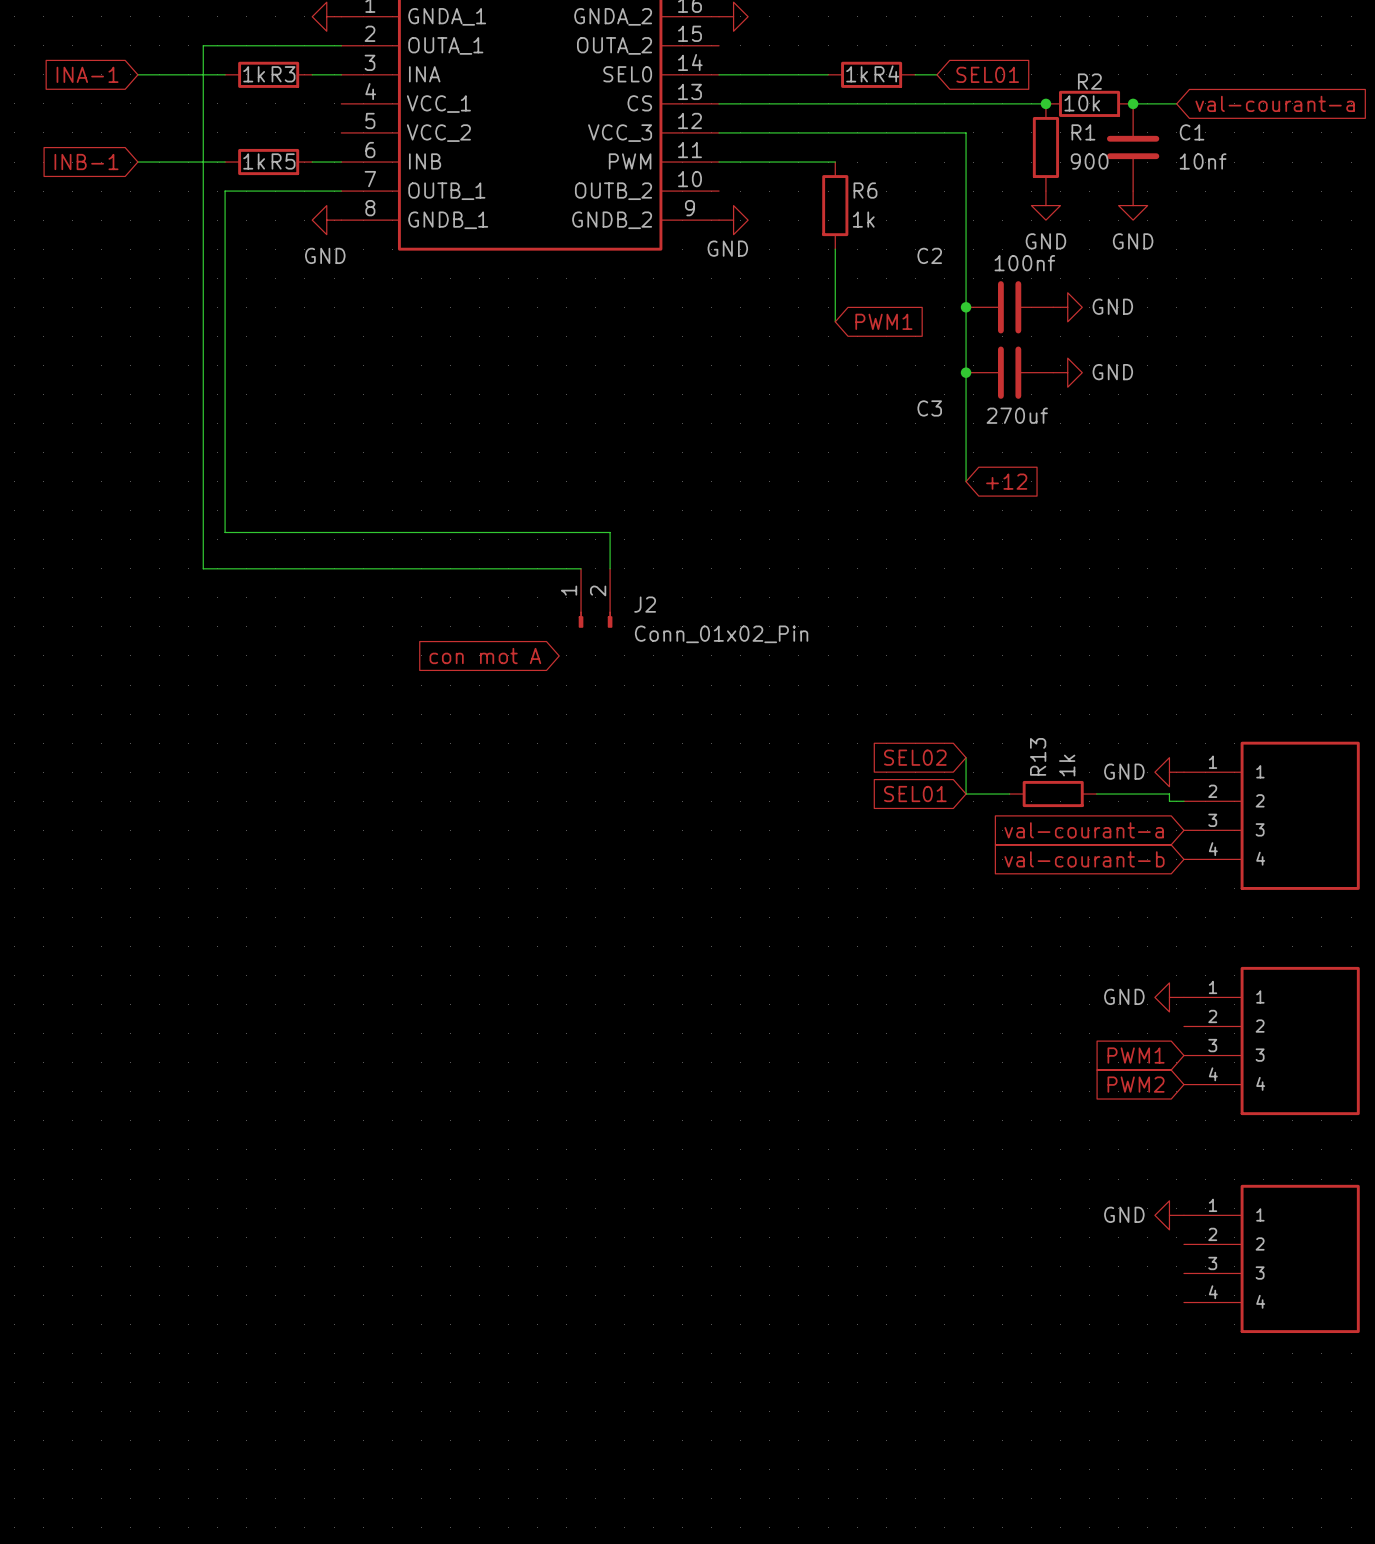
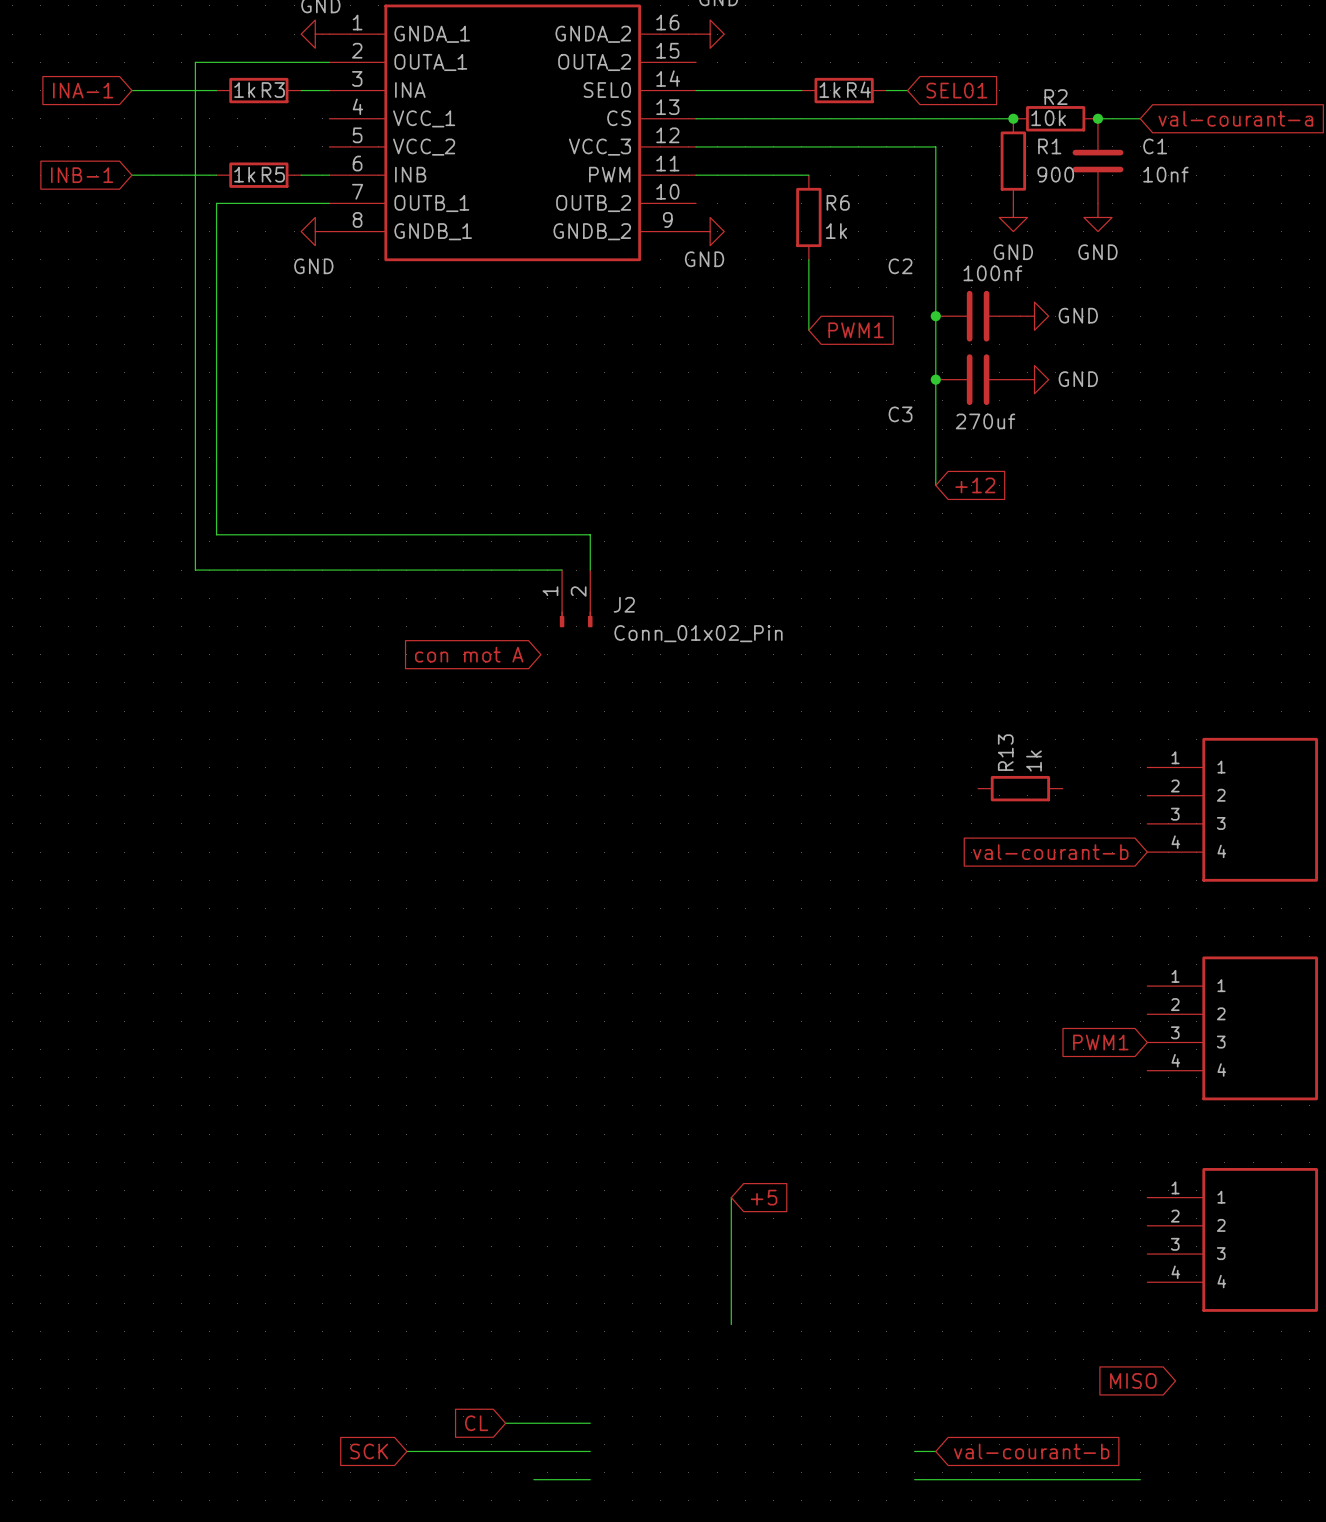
global label: SEL02 (915, 757) -> none
wire: (966, 757) (966, 794) (1009, 794) -> none
power symbol: GND (1169, 772) -> none
global label: SEL01 (915, 794) -> none
wire: (1096, 794) (1169, 794) (1169, 801) (1183, 801) -> none
global label: val-courant-a (1084, 830) -> none
power symbol: GND (1169, 997) -> none
global label: PWM2 (1136, 1084) -> none
wire: none -> (731, 1197) (731, 1324)
global label: none -> +5 (764, 1197)
power symbol: GND (1169, 1215) -> none
global label: none -> MISO (1133, 1380)
global label: none -> CL (476, 1423)
wire: none -> (505, 1423) (590, 1423)
global label: none -> SCK (369, 1451)
wire: none -> (406, 1451) (590, 1451)
wire: none -> (914, 1451) (935, 1451)
global label: none -> val-courant-b (1031, 1451)
wire: none -> (533, 1479) (590, 1479)
wire: none -> (914, 1479) (1140, 1479)

